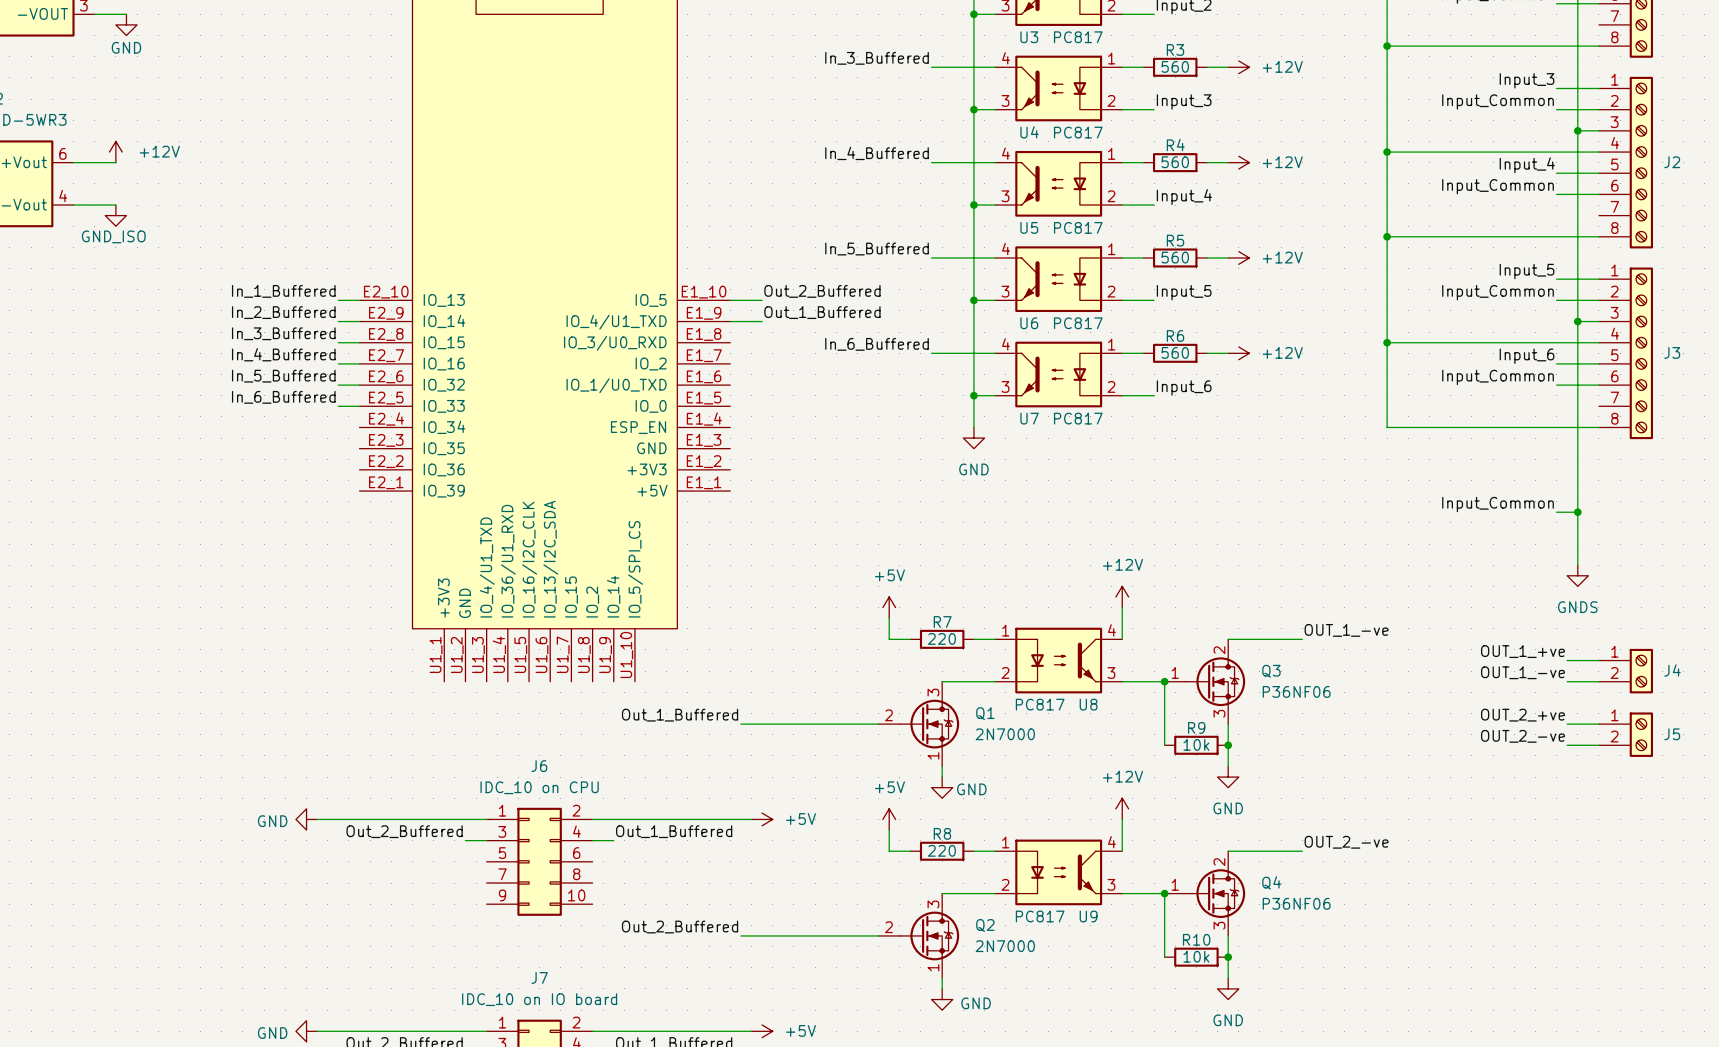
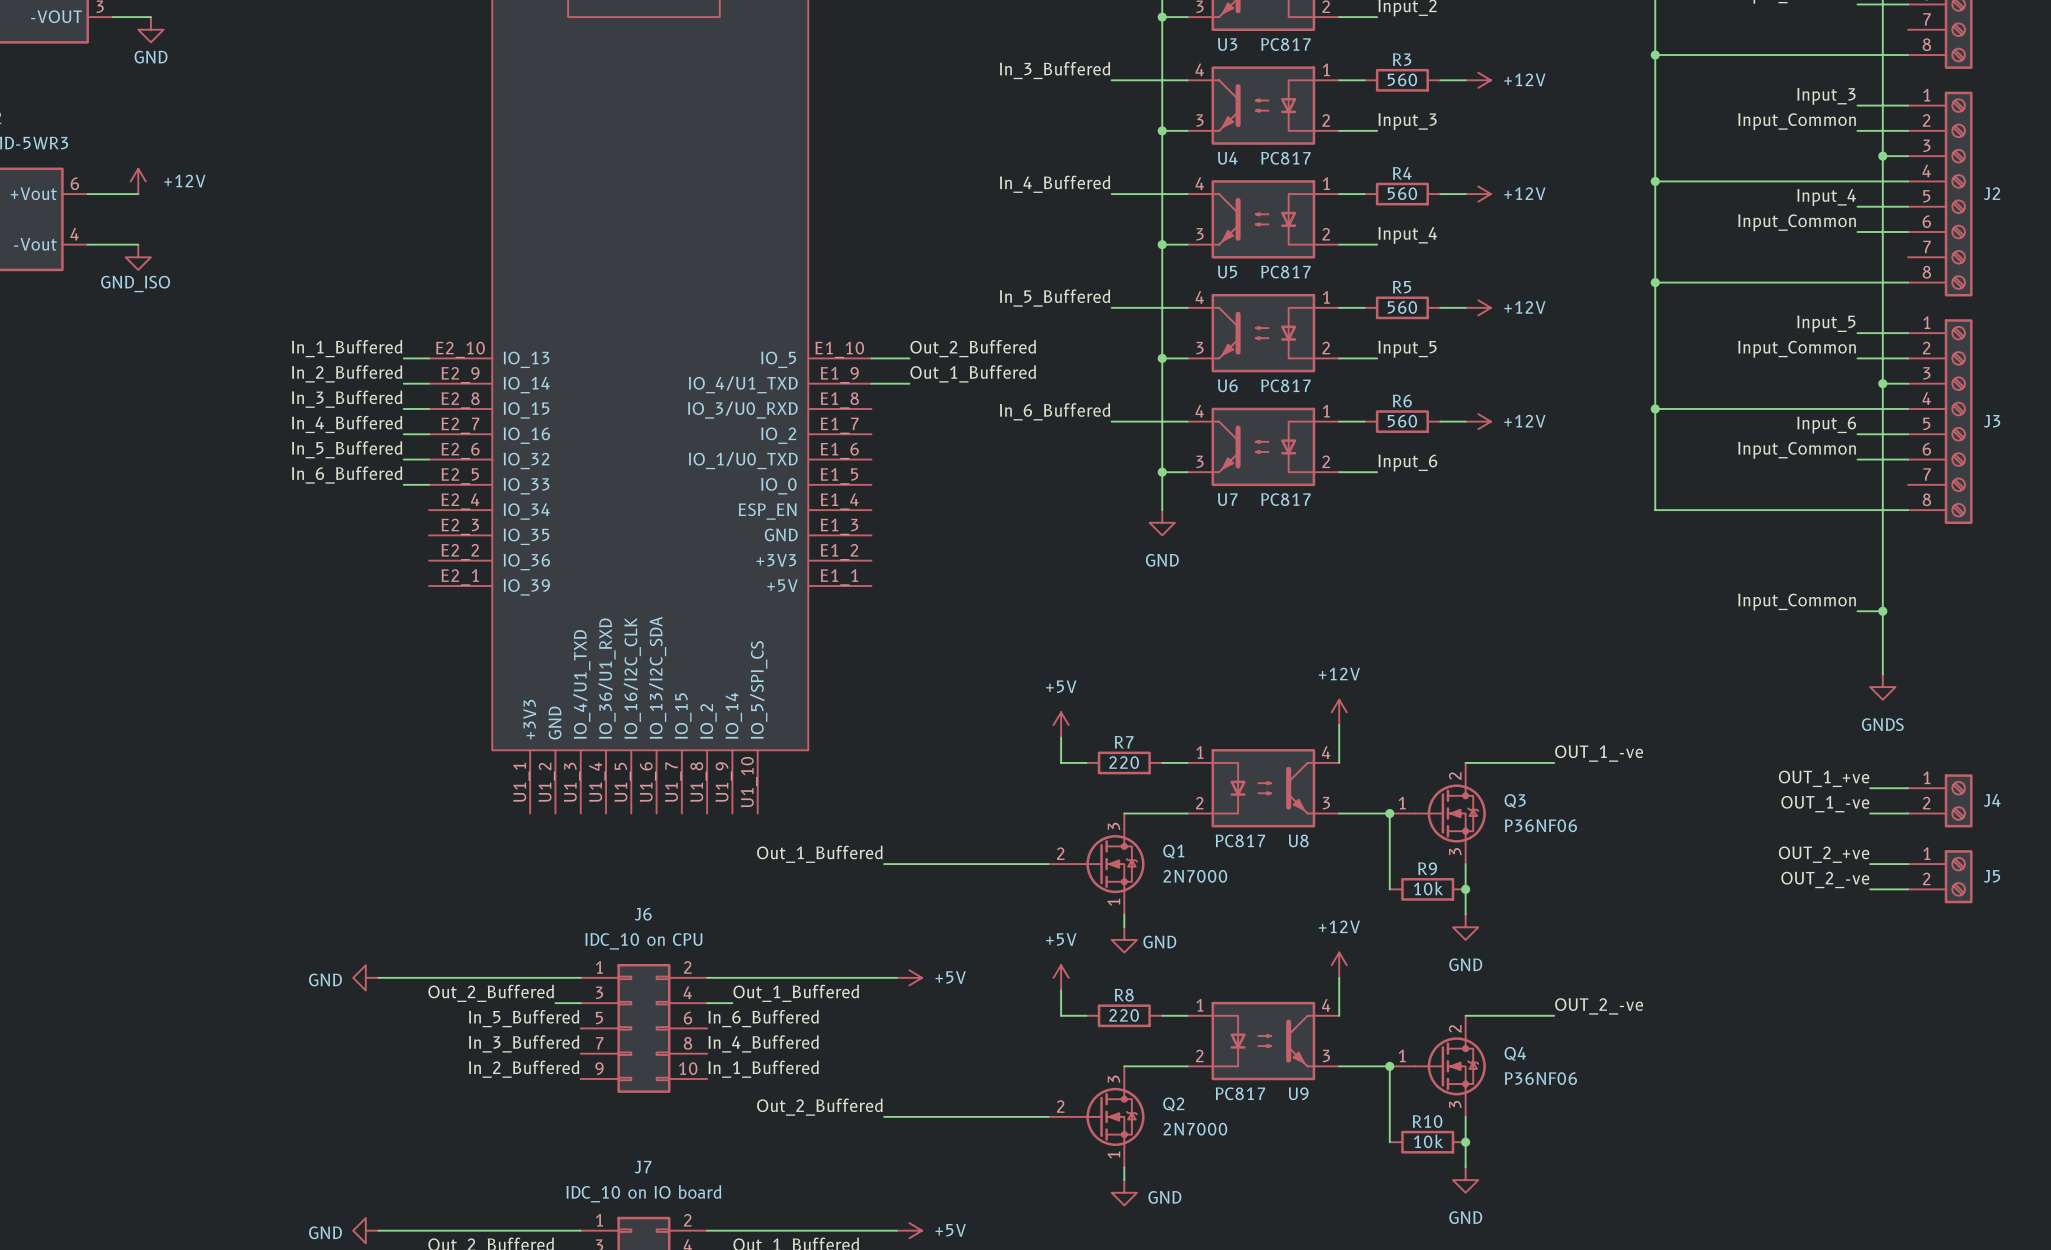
label: none -> In_5_Buffered (524, 1018)
label: none -> In_6_Buffered (763, 1018)
label: none -> In_4_Buffered (763, 1043)
label: none -> In_3_Buffered (524, 1043)
label: none -> In_2_Buffered (524, 1069)
label: none -> In_1_Buffered (763, 1069)

